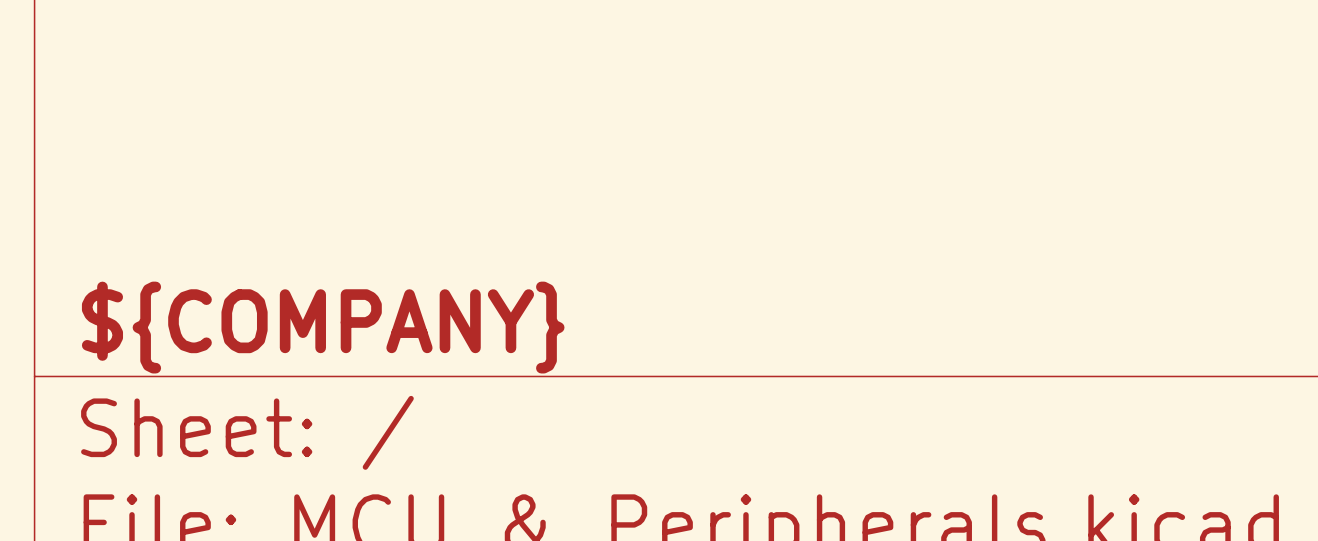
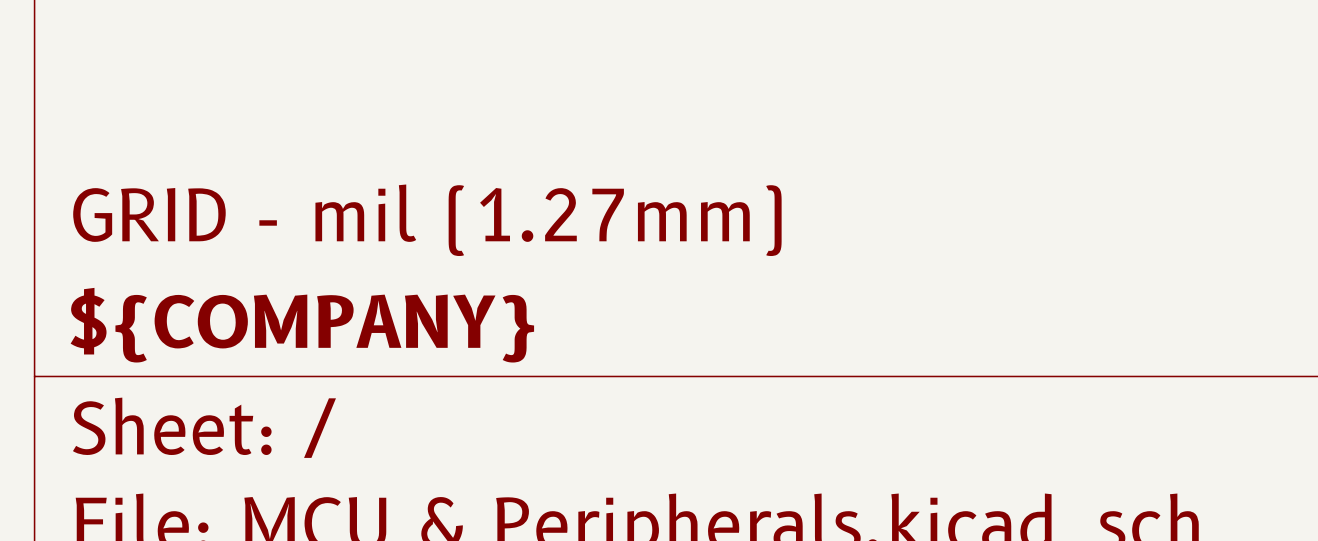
title block: none -> GRID - mil (1.27mm) (427, 220)

